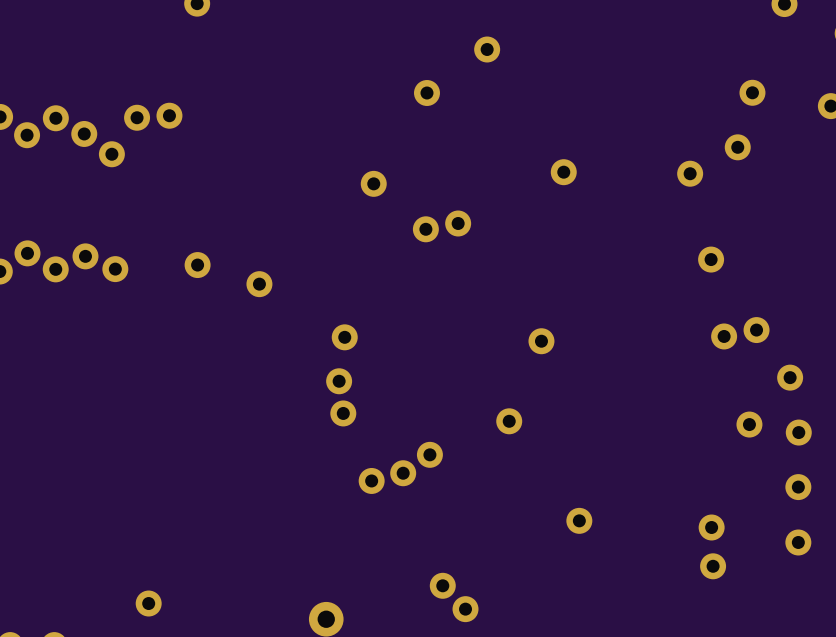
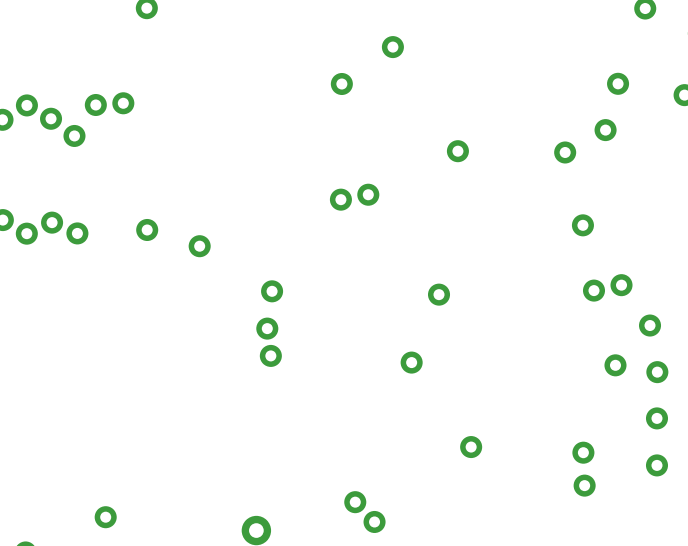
via: (373, 183) -> none
via: (429, 454) -> none
via: (403, 473) -> none
via: (371, 480) -> none

